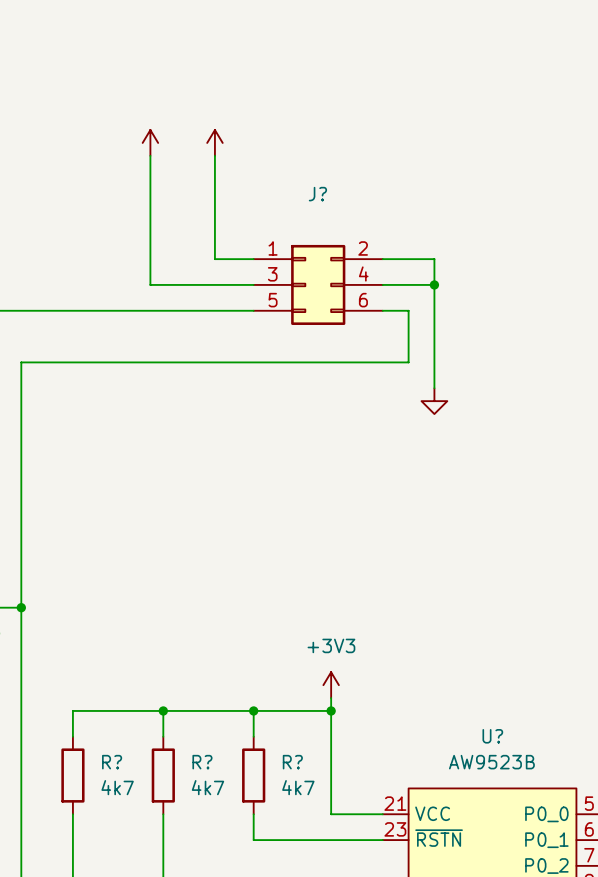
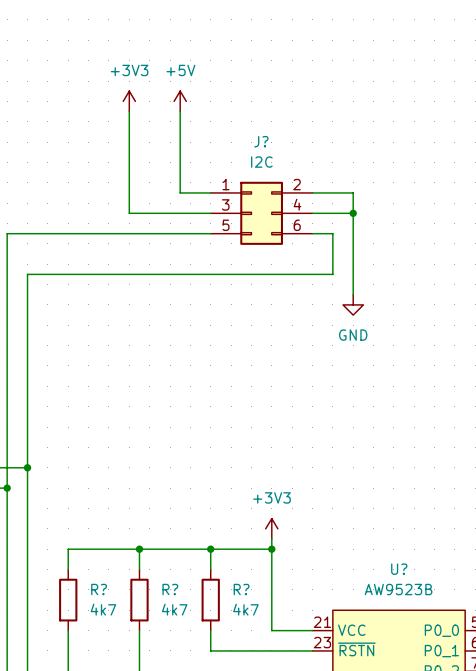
power symbol text: none -> +3V3 (129, 70)
power symbol text: none -> +5V (180, 70)
J? value: none -> I2C (261, 162)
power symbol text: none -> GND (353, 335)

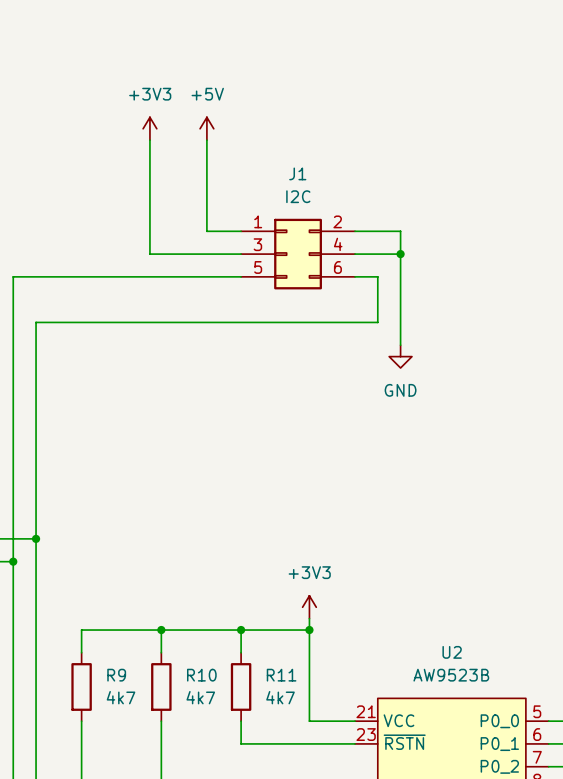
J? name: J? (261, 141) -> J1 (297, 173)
U? name: U? (399, 569) -> U2 (452, 652)
R? name: R? (99, 589) -> R9 (116, 675)
R? name: R? (170, 589) -> R10 (201, 675)
R? name: R? (241, 589) -> R11 (281, 675)

